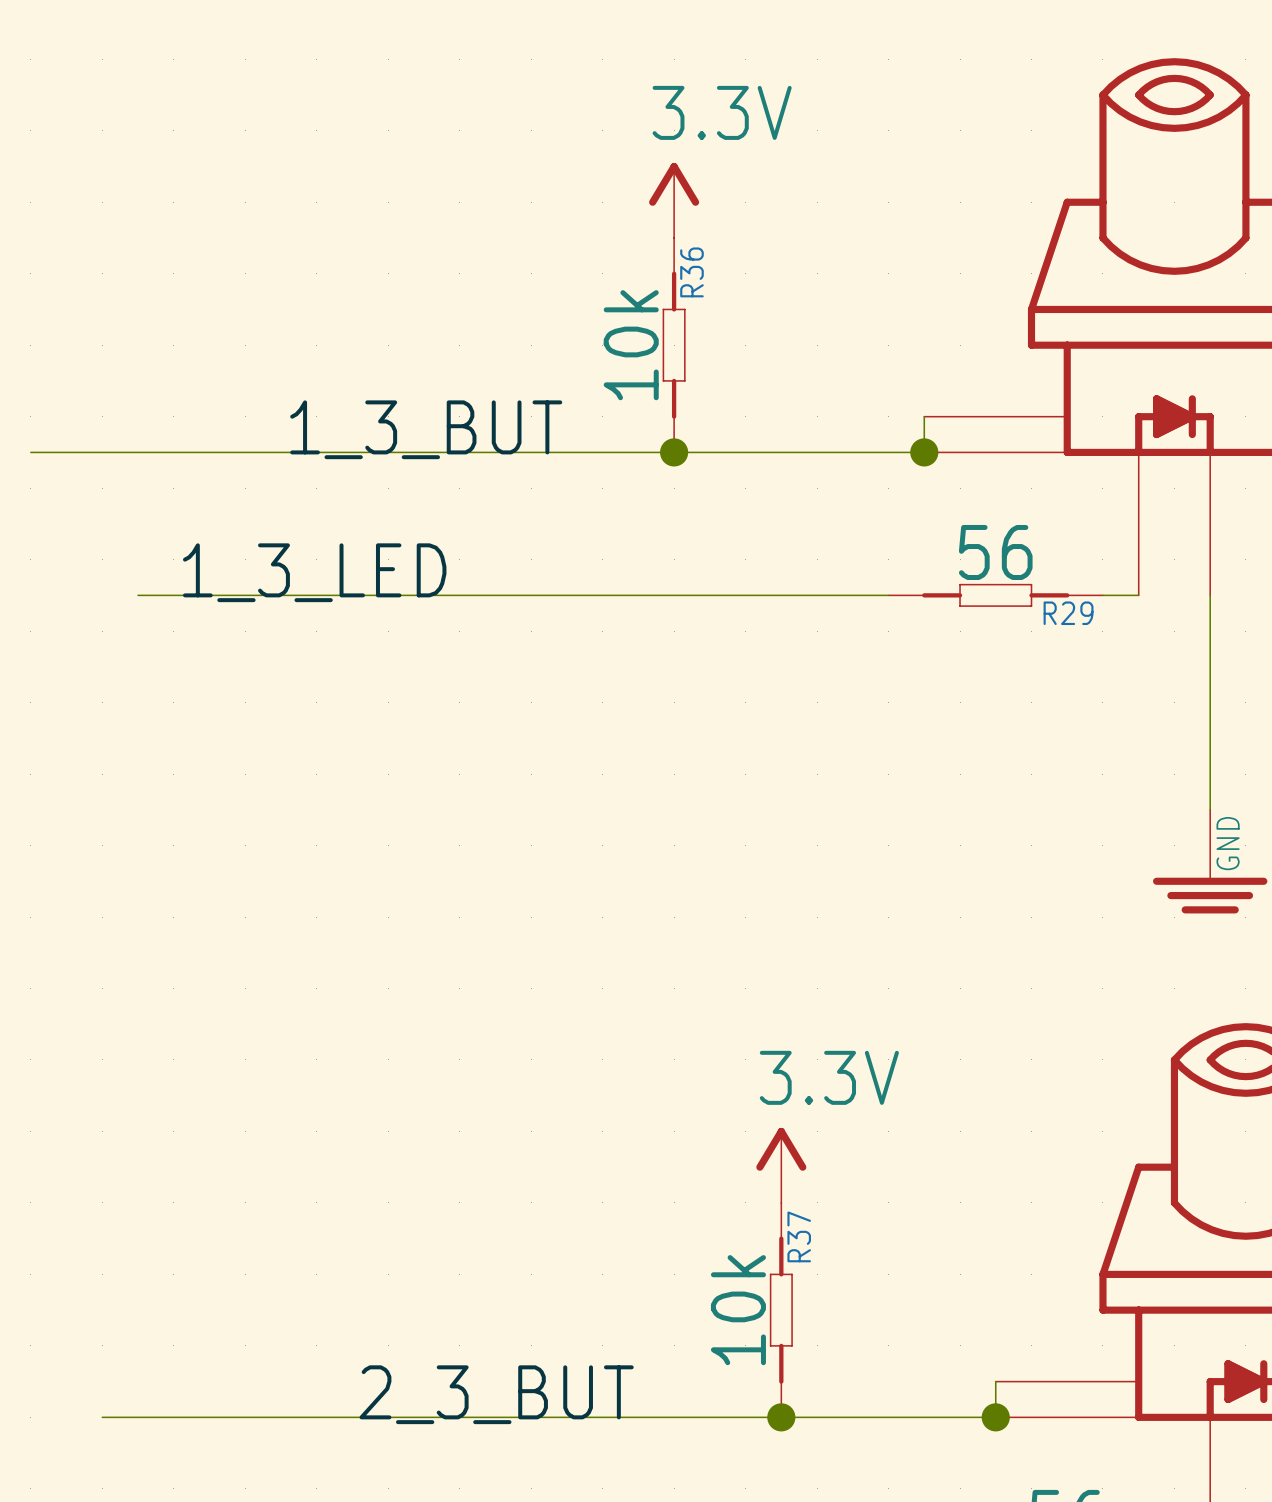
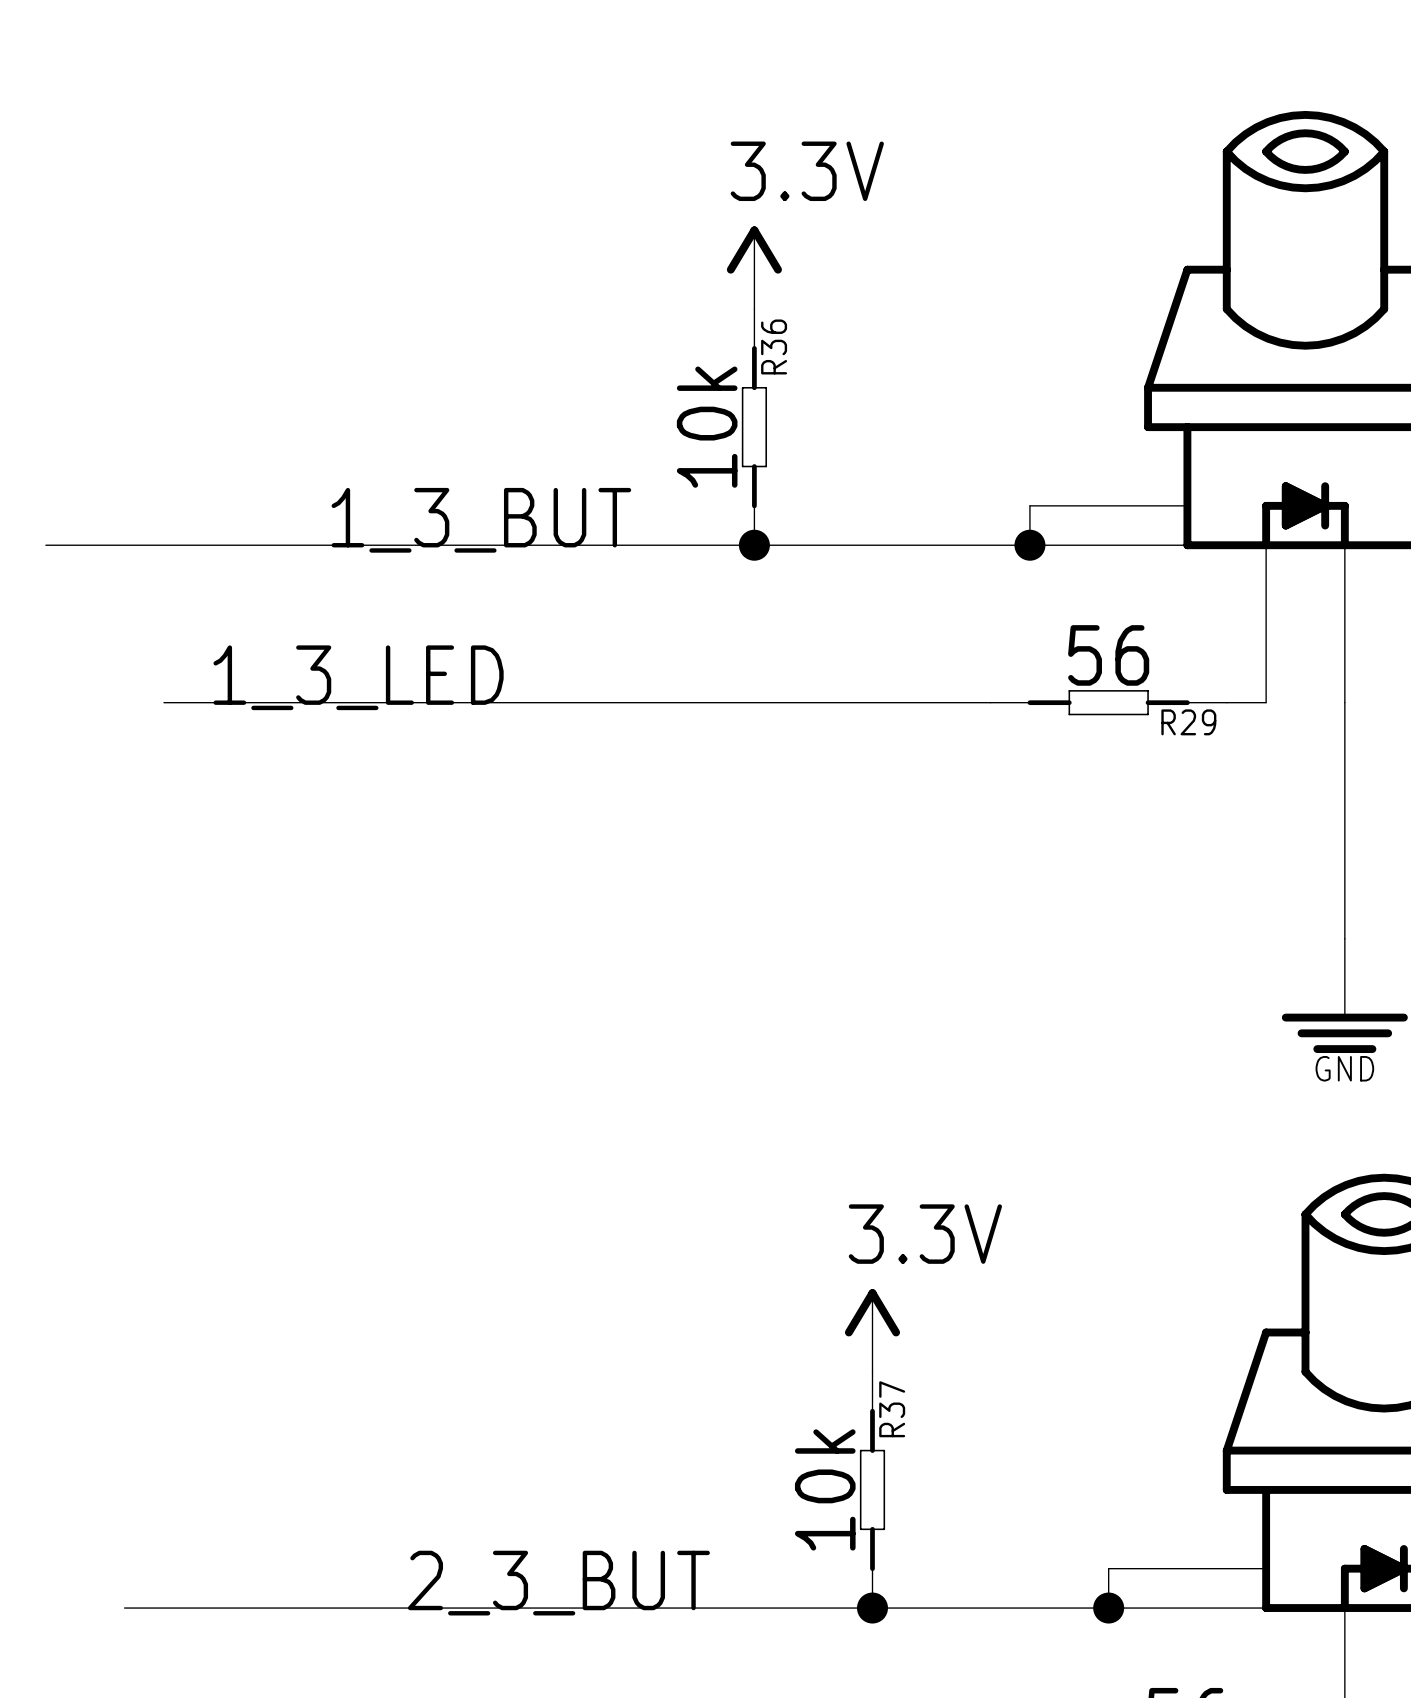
power symbol text rotation: 0° (1228, 843) -> 90° clockwise (1344, 1068)
power symbol text position: GND (1228, 843) -> GND (1344, 1068)

